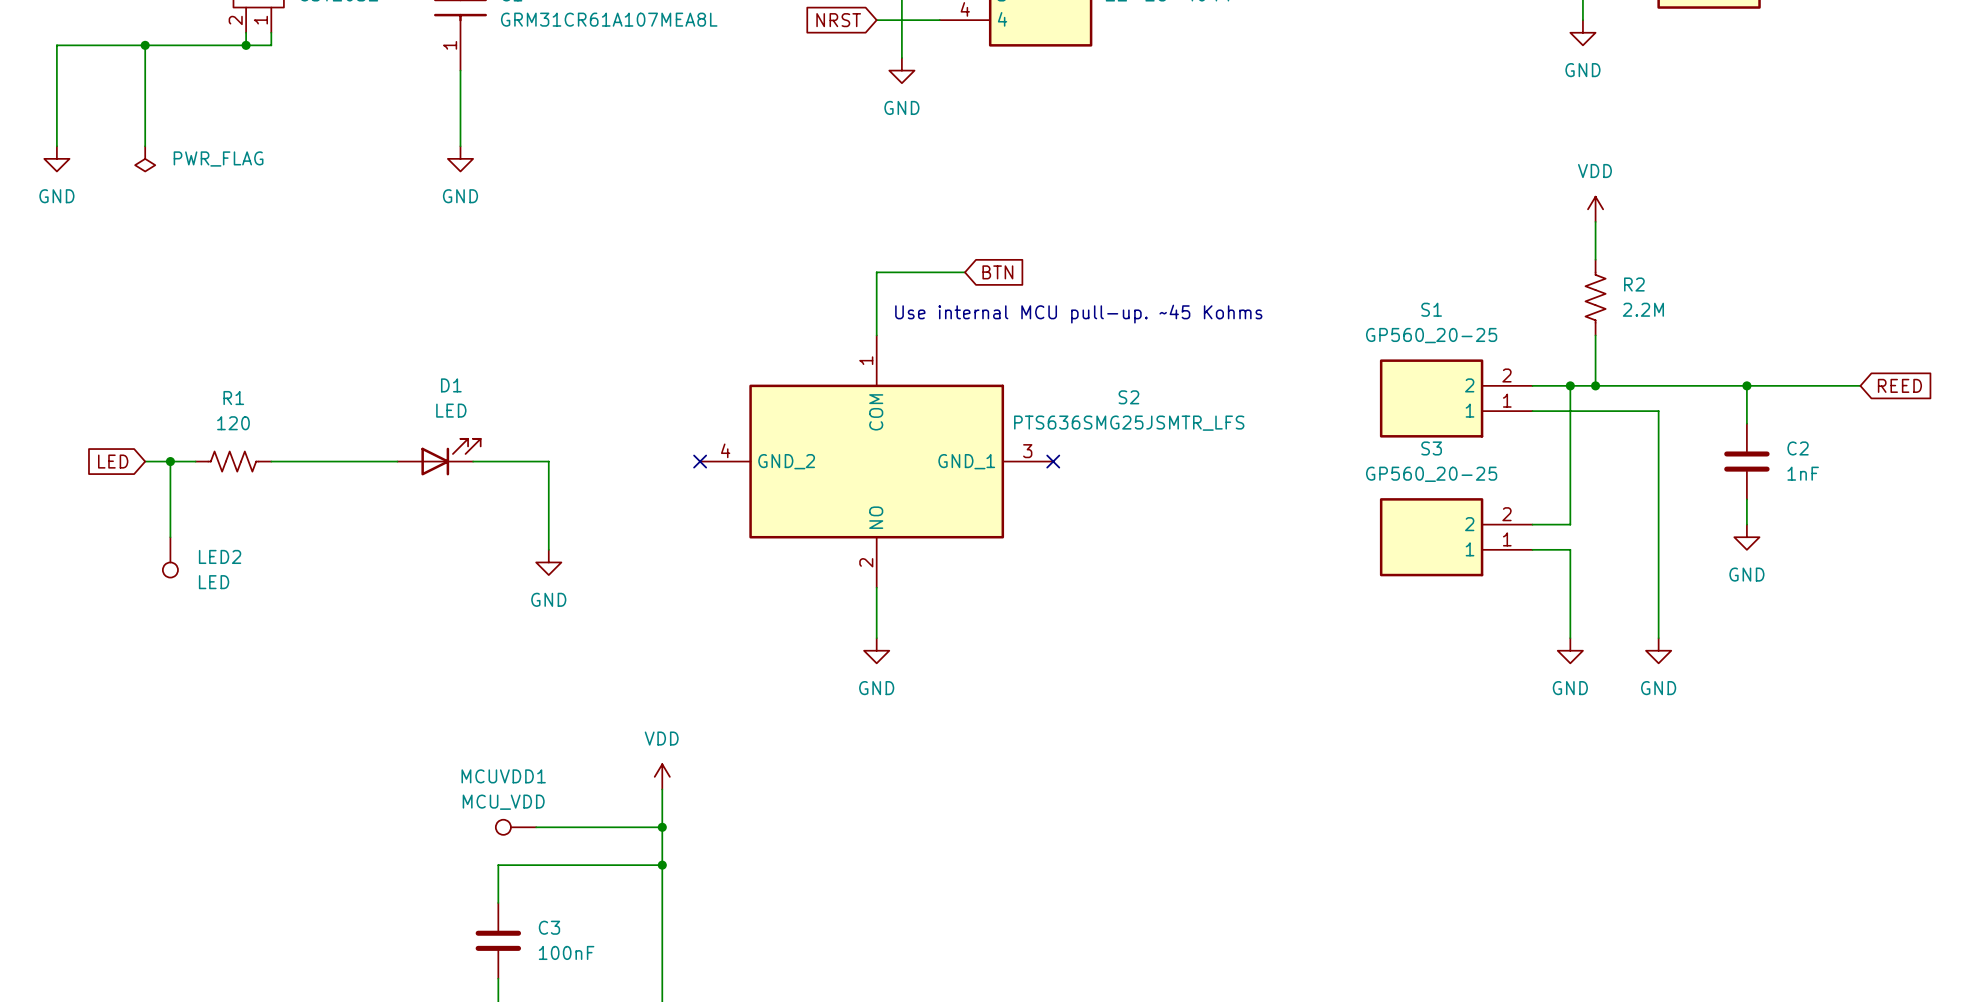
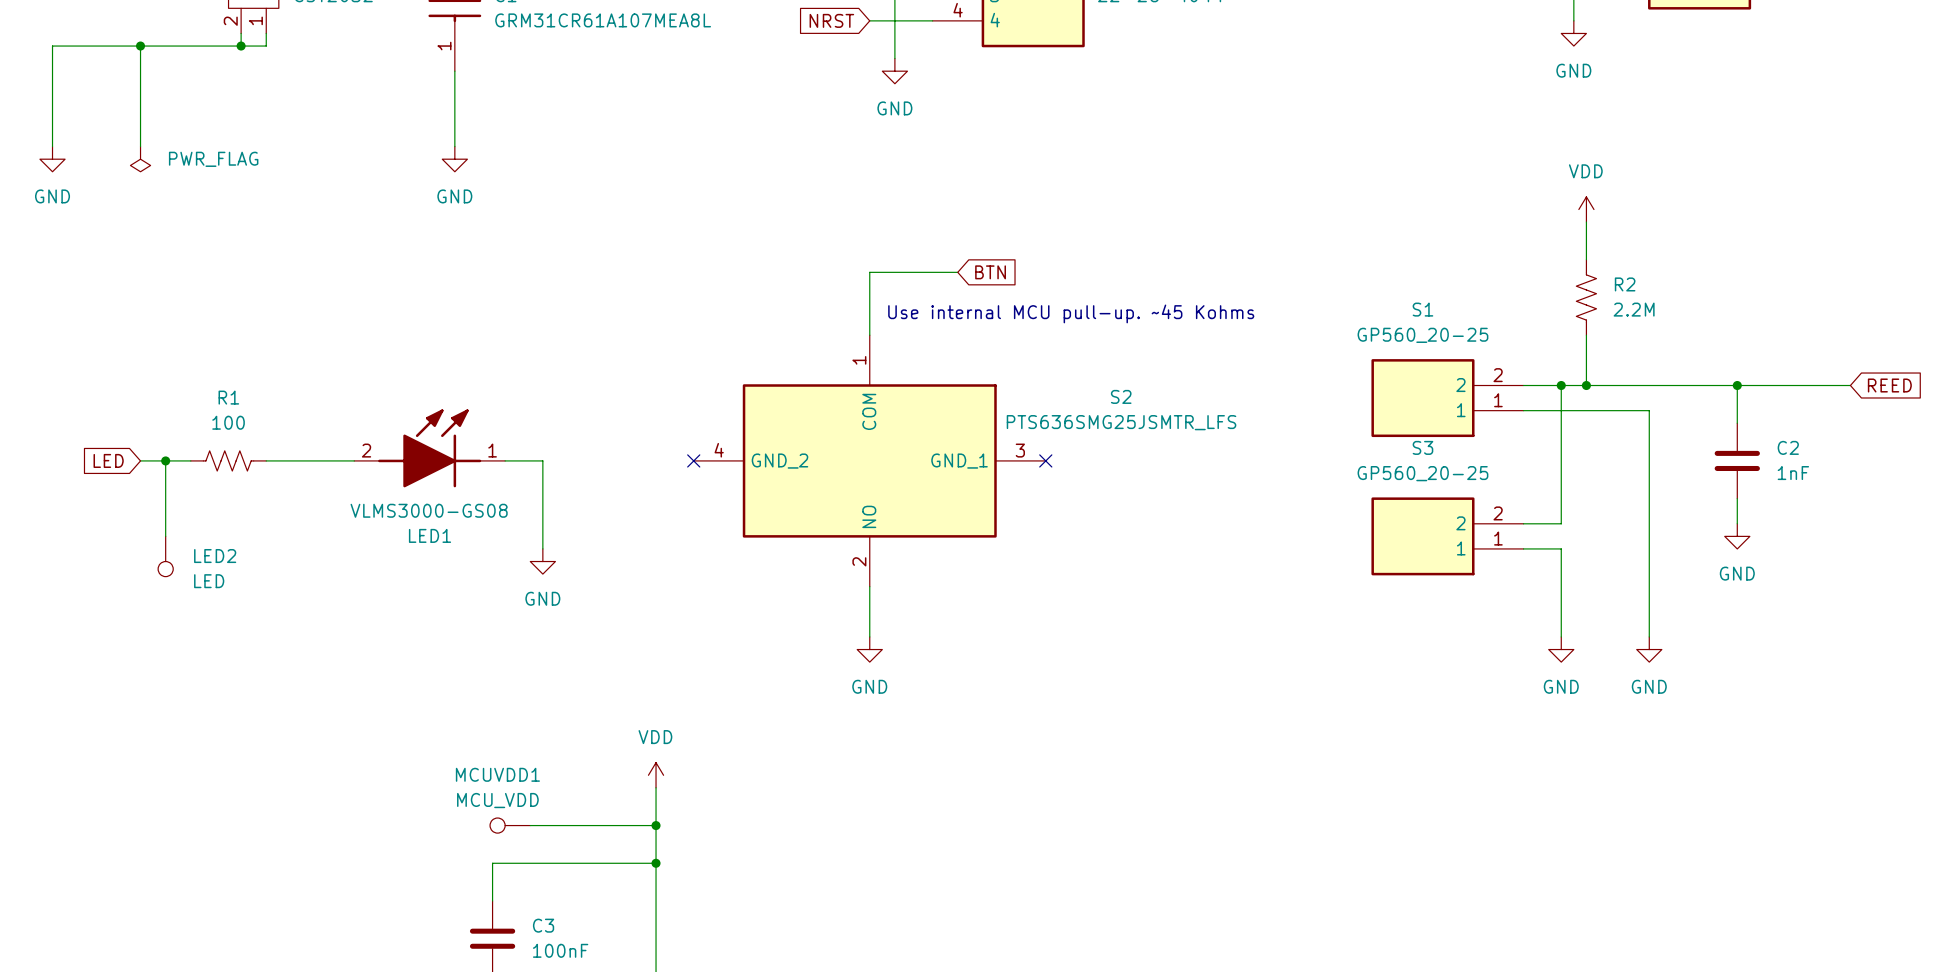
R1 value: 120 (233, 423) -> 100 (228, 422)
LED1: none -> VLMS3000-GS08 (429, 448)
D1: LED (439, 457) -> none

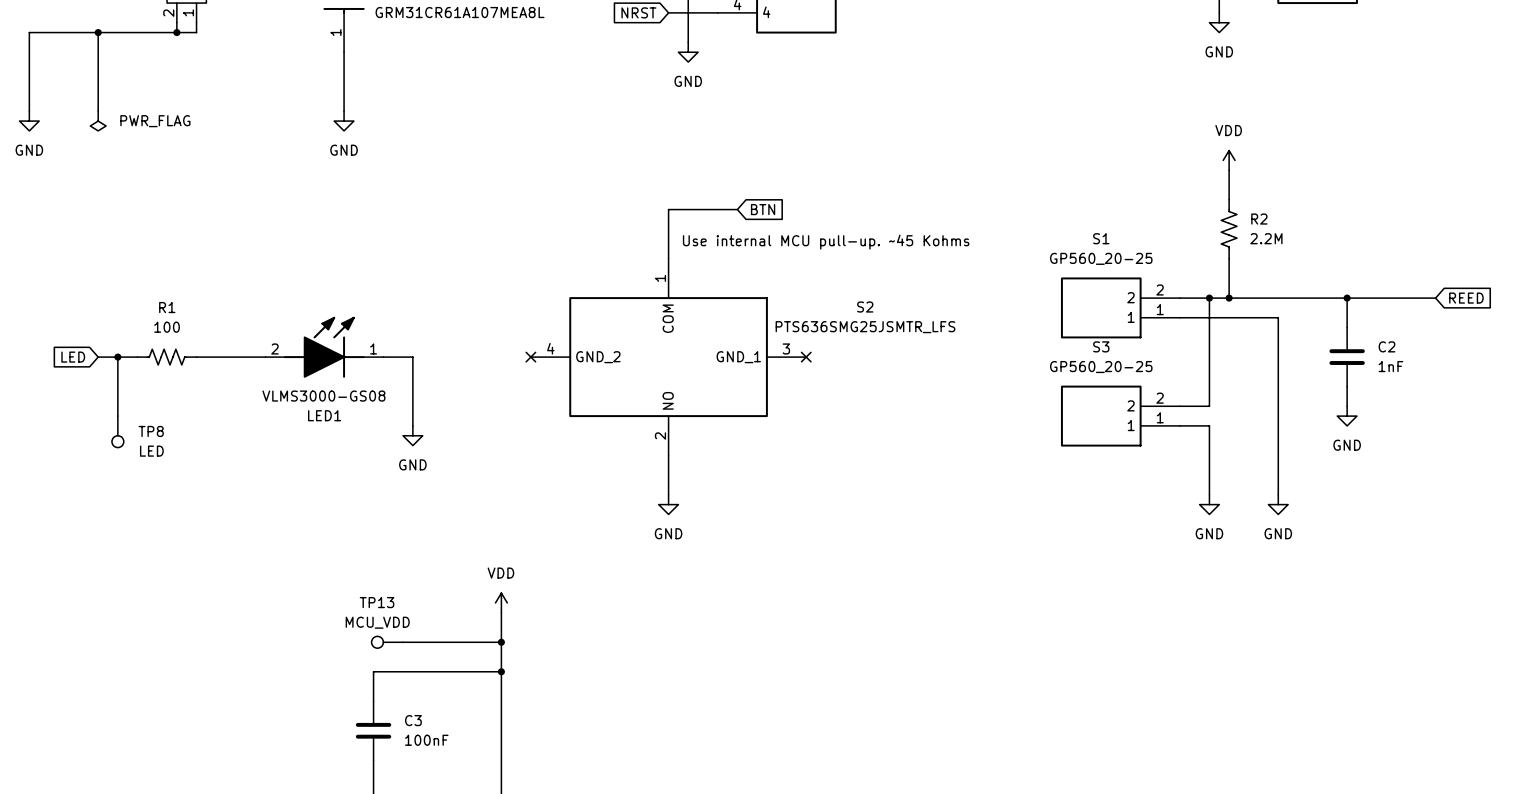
LED2 name: LED2 (215, 556) -> TP8 (151, 431)
MCUVDD1 name: MCUVDD1 (497, 774) -> TP13 (377, 602)

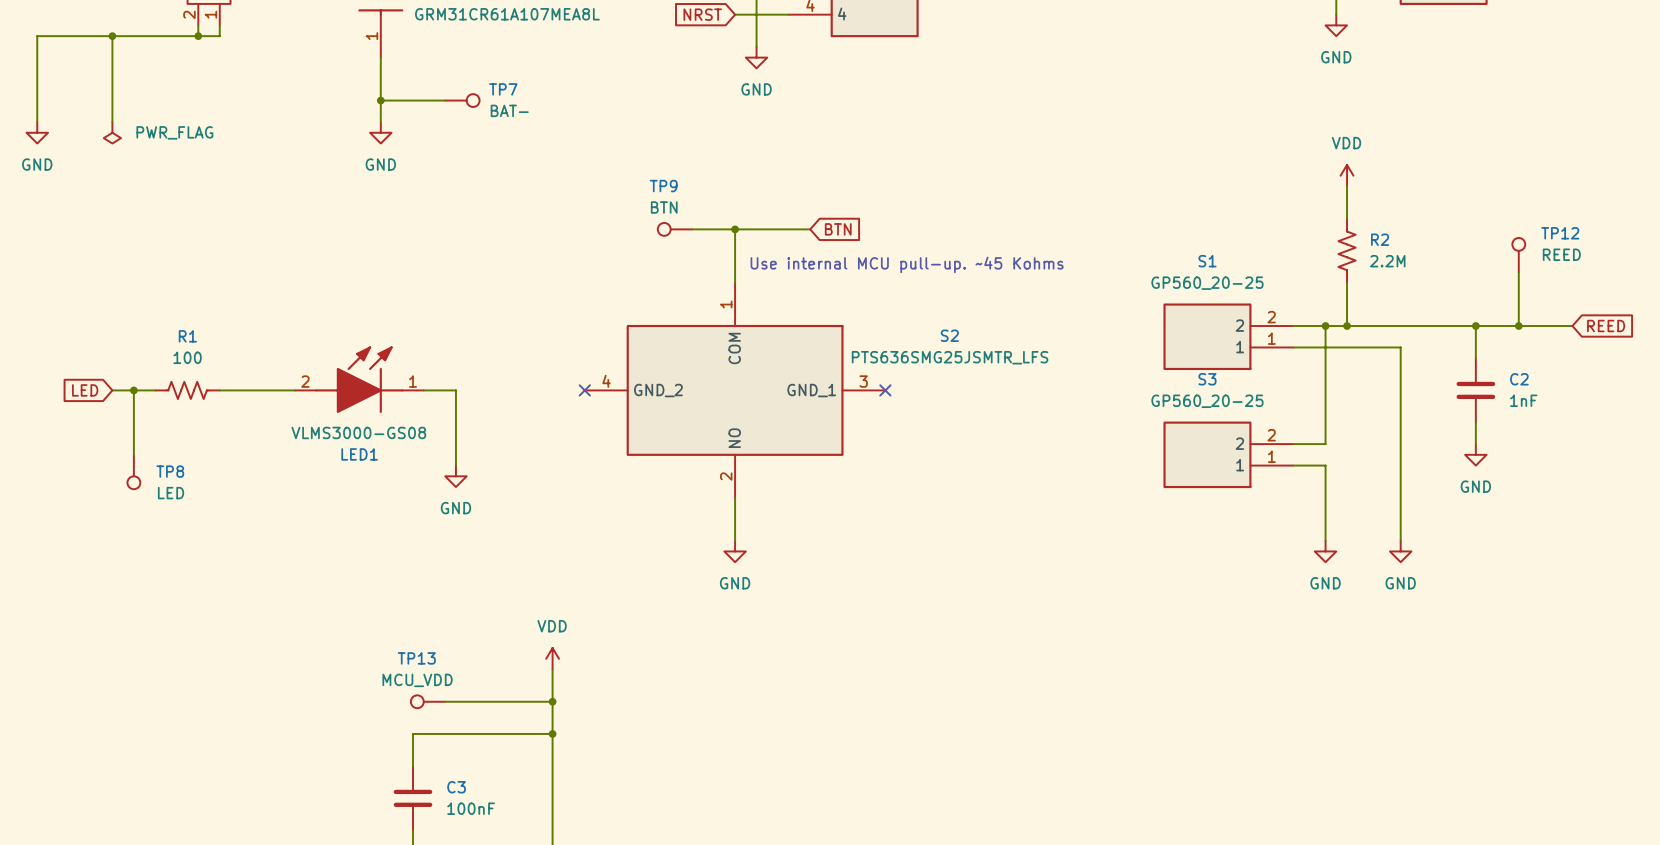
wire: none -> (380, 100) (445, 100)
junction: none -> (380, 100)
TP7: none -> BAT- (462, 100)
TP9: none -> BTN (674, 229)
wire: none -> (692, 229) (735, 229)
junction: none -> (735, 229)
TP12: none -> REED (1518, 255)
wire: none -> (1518, 272) (1518, 326)
junction: none -> (1518, 326)

